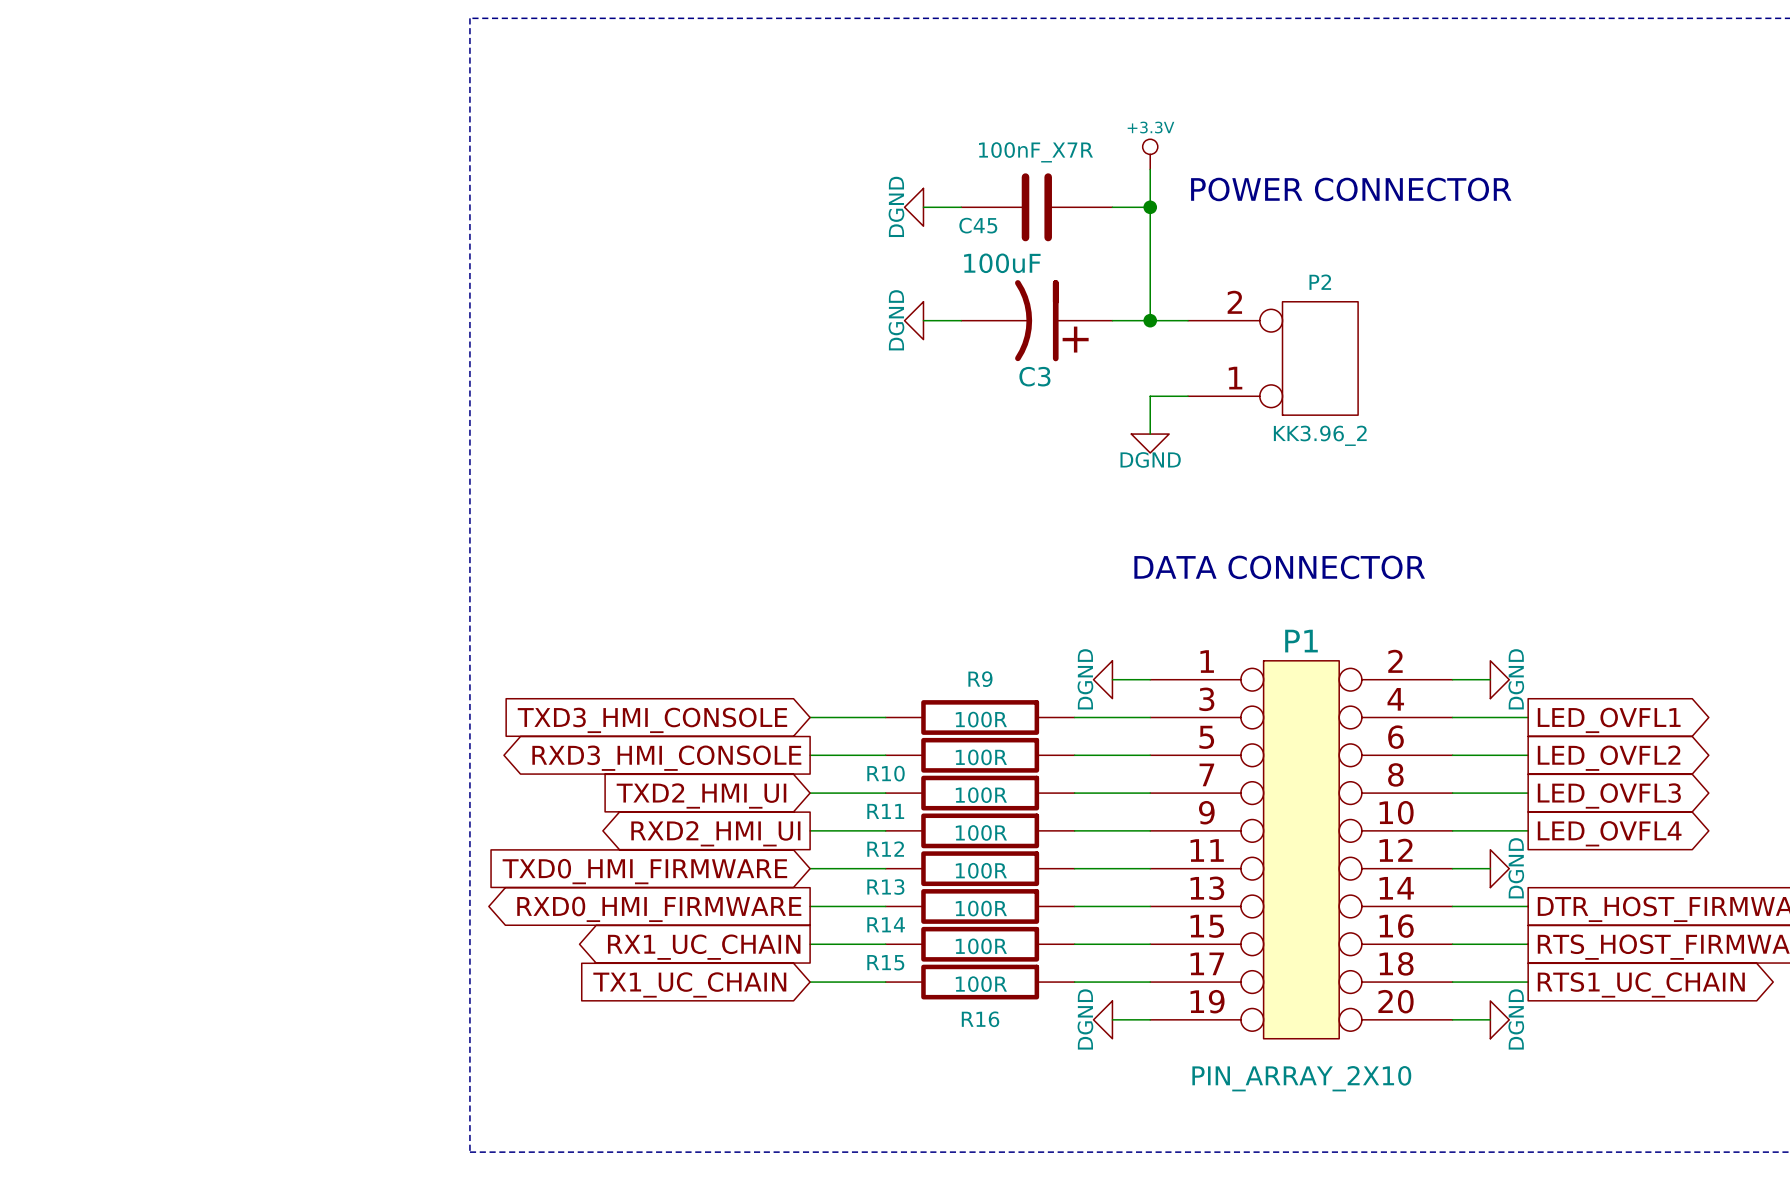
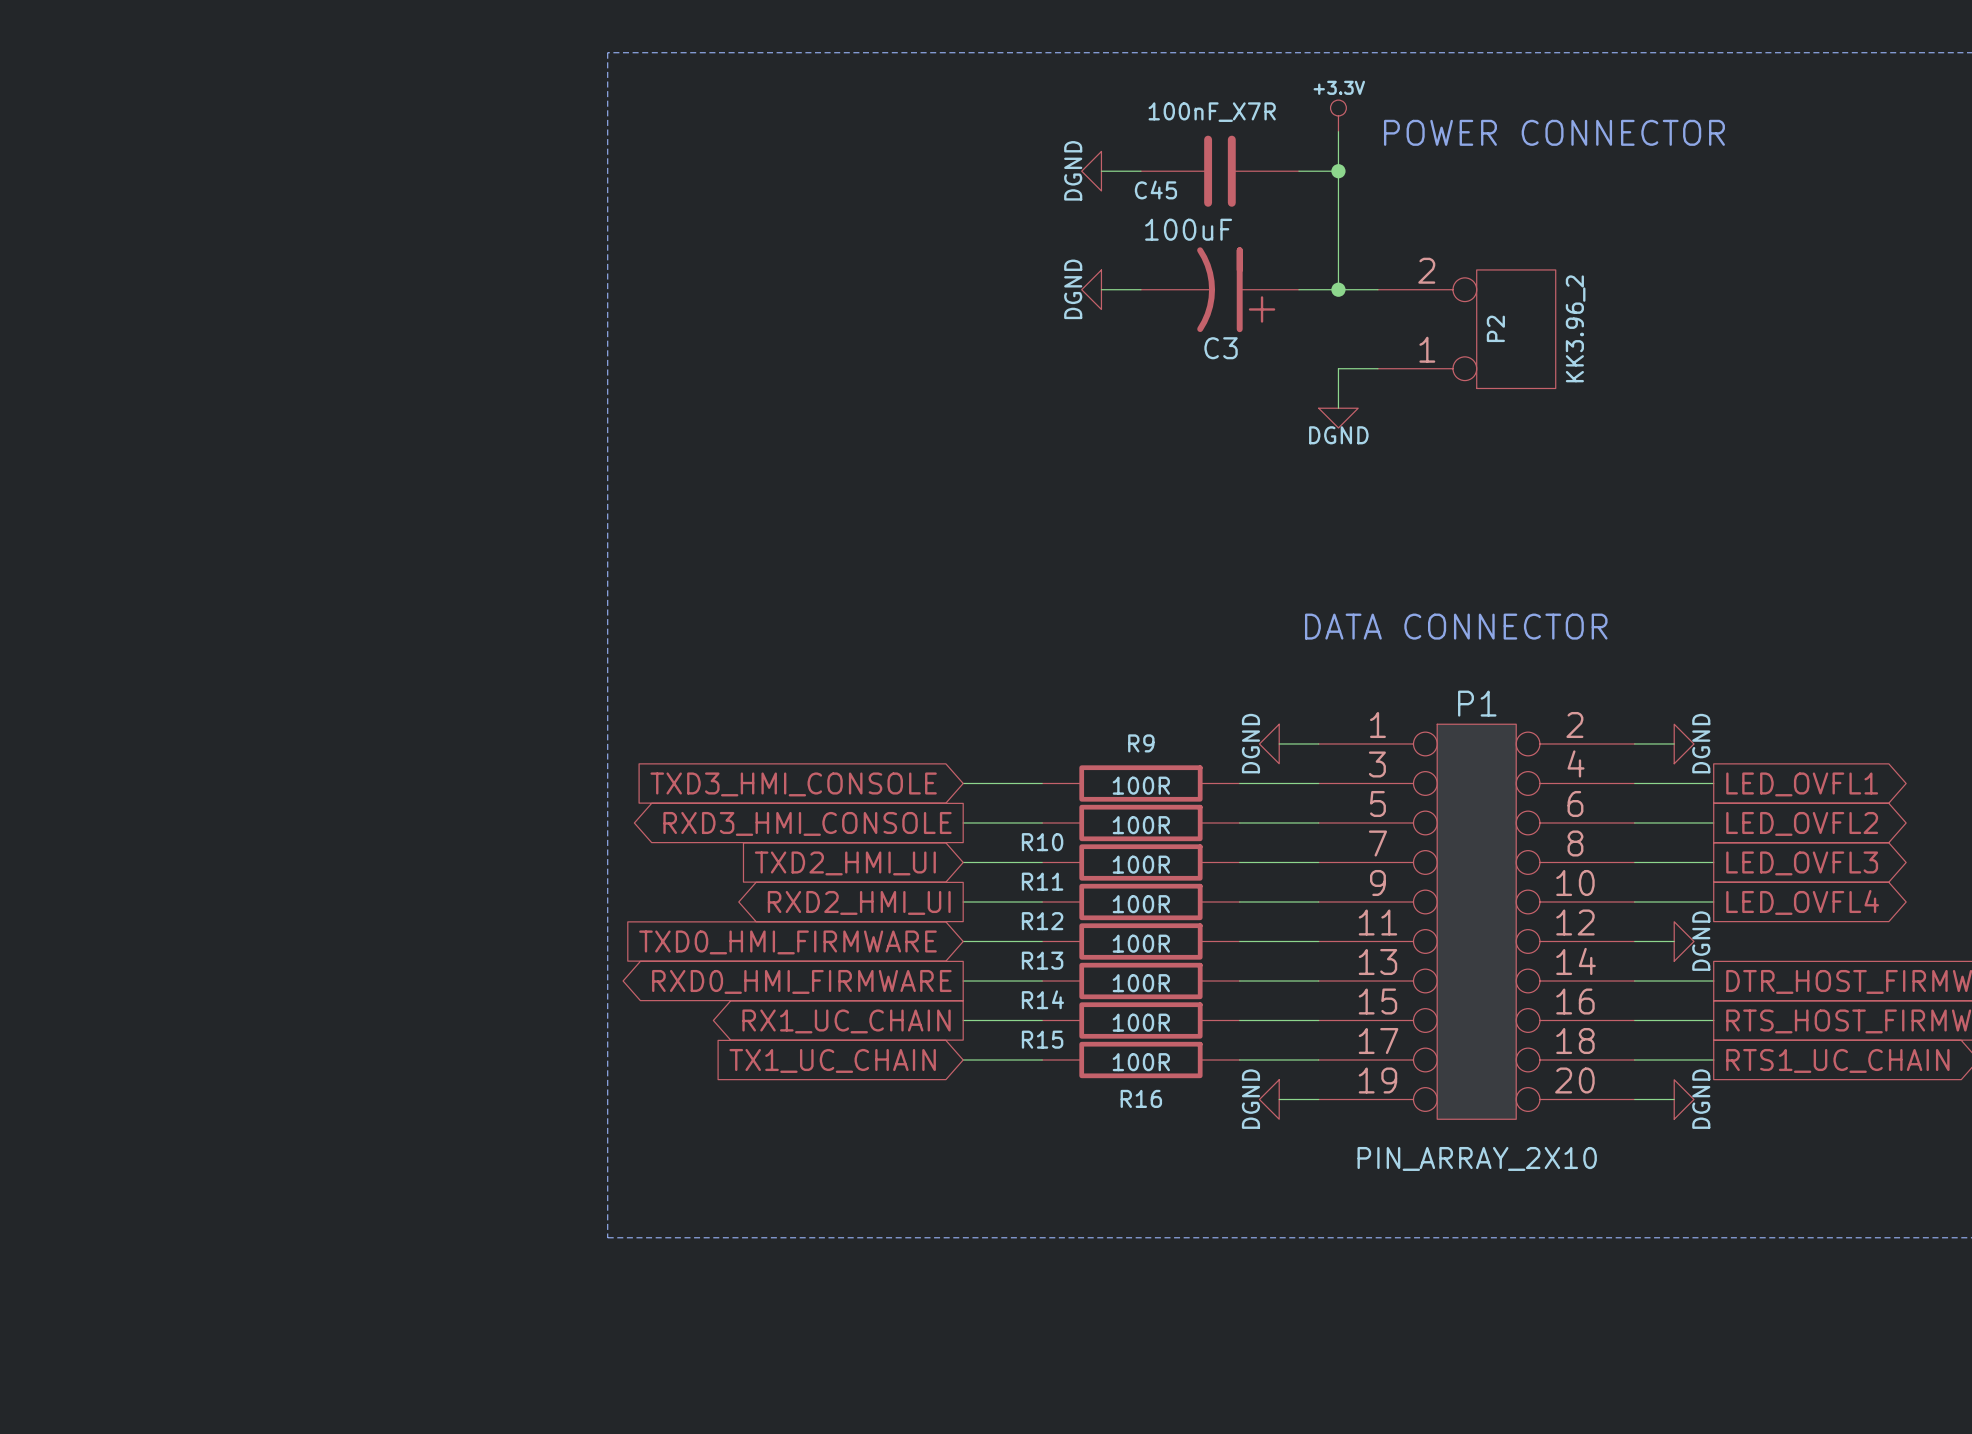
power symbol: none -> DGND (1091, 171)
junction: none -> (1338, 171)
power symbol position: +3.3V (1150, 154) -> +3.3V (1338, 115)
wire: (1150, 169) (1150, 320) -> (1338, 131) (1338, 289)
text position: POWER CONNECTOR (1351, 189) -> POWER CONNECTOR (1554, 132)
power symbol: DGND (914, 207) -> none
wire: (923, 207) (961, 207) -> (1101, 171) (1140, 171)
C45 position: (1036, 207) -> (1219, 171)
wire: (1112, 207) (1150, 207) -> (1298, 171) (1338, 171)
junction: (1150, 207) -> none
power symbol: none -> DGND (1091, 289)
wire: none -> (1298, 289) (1377, 289)
junction: none -> (1338, 289)
P2 name rotation: 0° (1320, 282) -> 90° counterclockwise (1495, 328)
power symbol: DGND (914, 320) -> none
wire: (923, 320) (961, 320) -> (1101, 289) (1140, 289)
C3 position: (1036, 320) -> (1219, 289)
wire: (1112, 320) (1169, 320) -> (1338, 408) (1338, 368)
junction: (1150, 320) -> none
P2 position: (1273, 358) -> (1466, 329)
wire: (1188, 396) (1150, 396) (1150, 434) -> none
P2 value rotation: 0° (1320, 435) -> 90° counterclockwise (1575, 328)
power symbol position: DGND (1150, 443) -> DGND (1338, 418)

